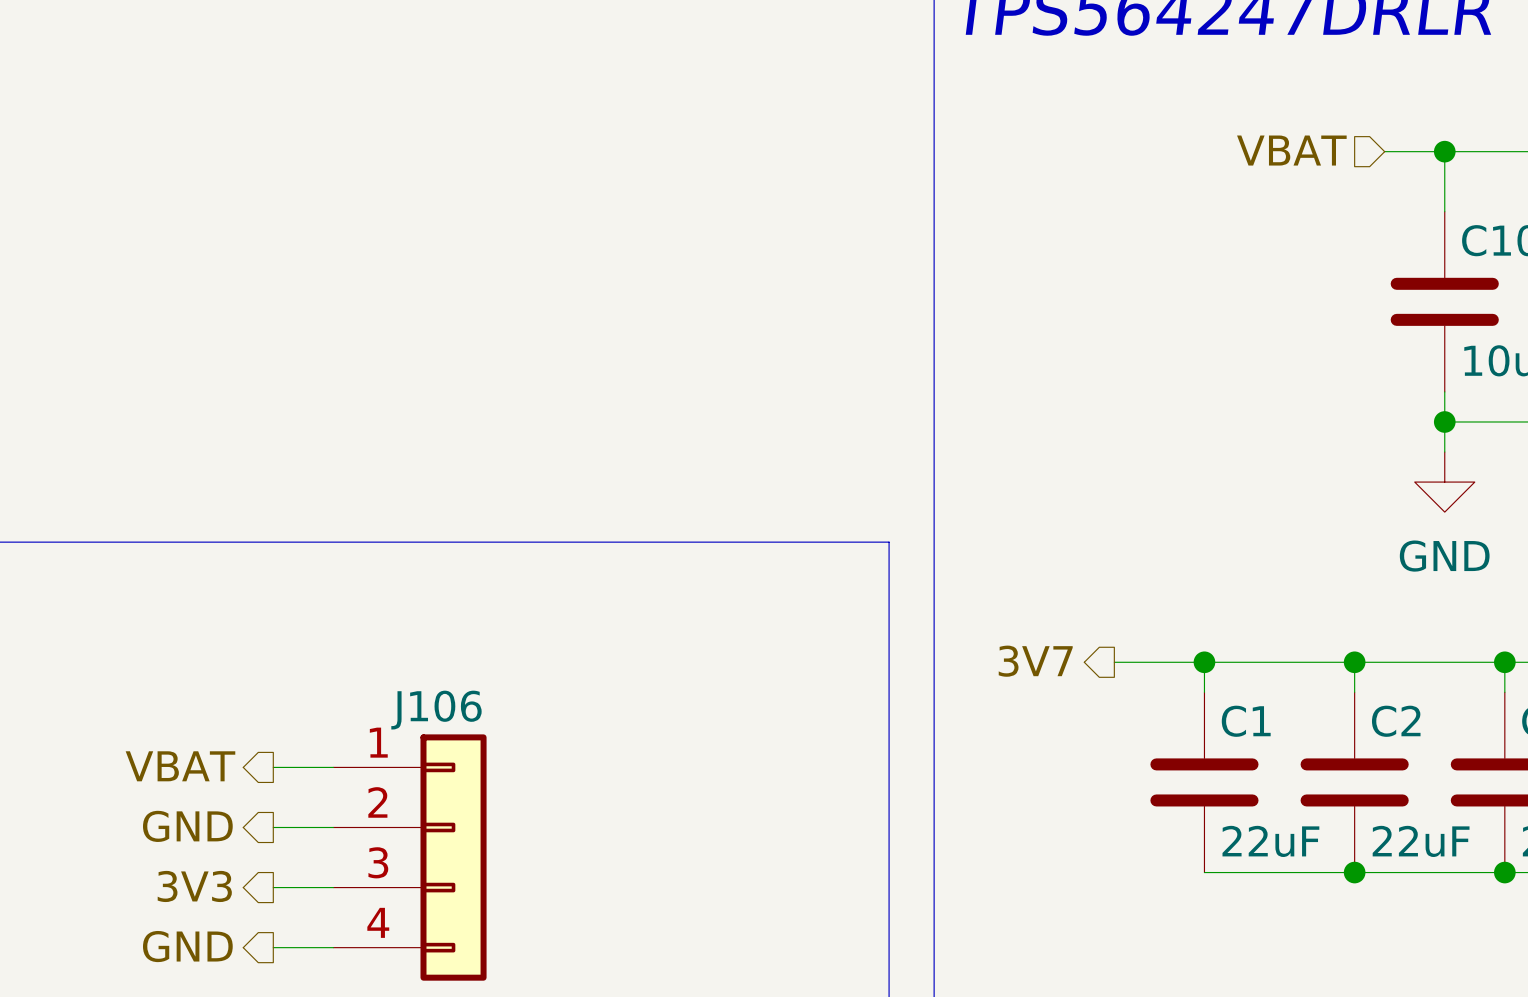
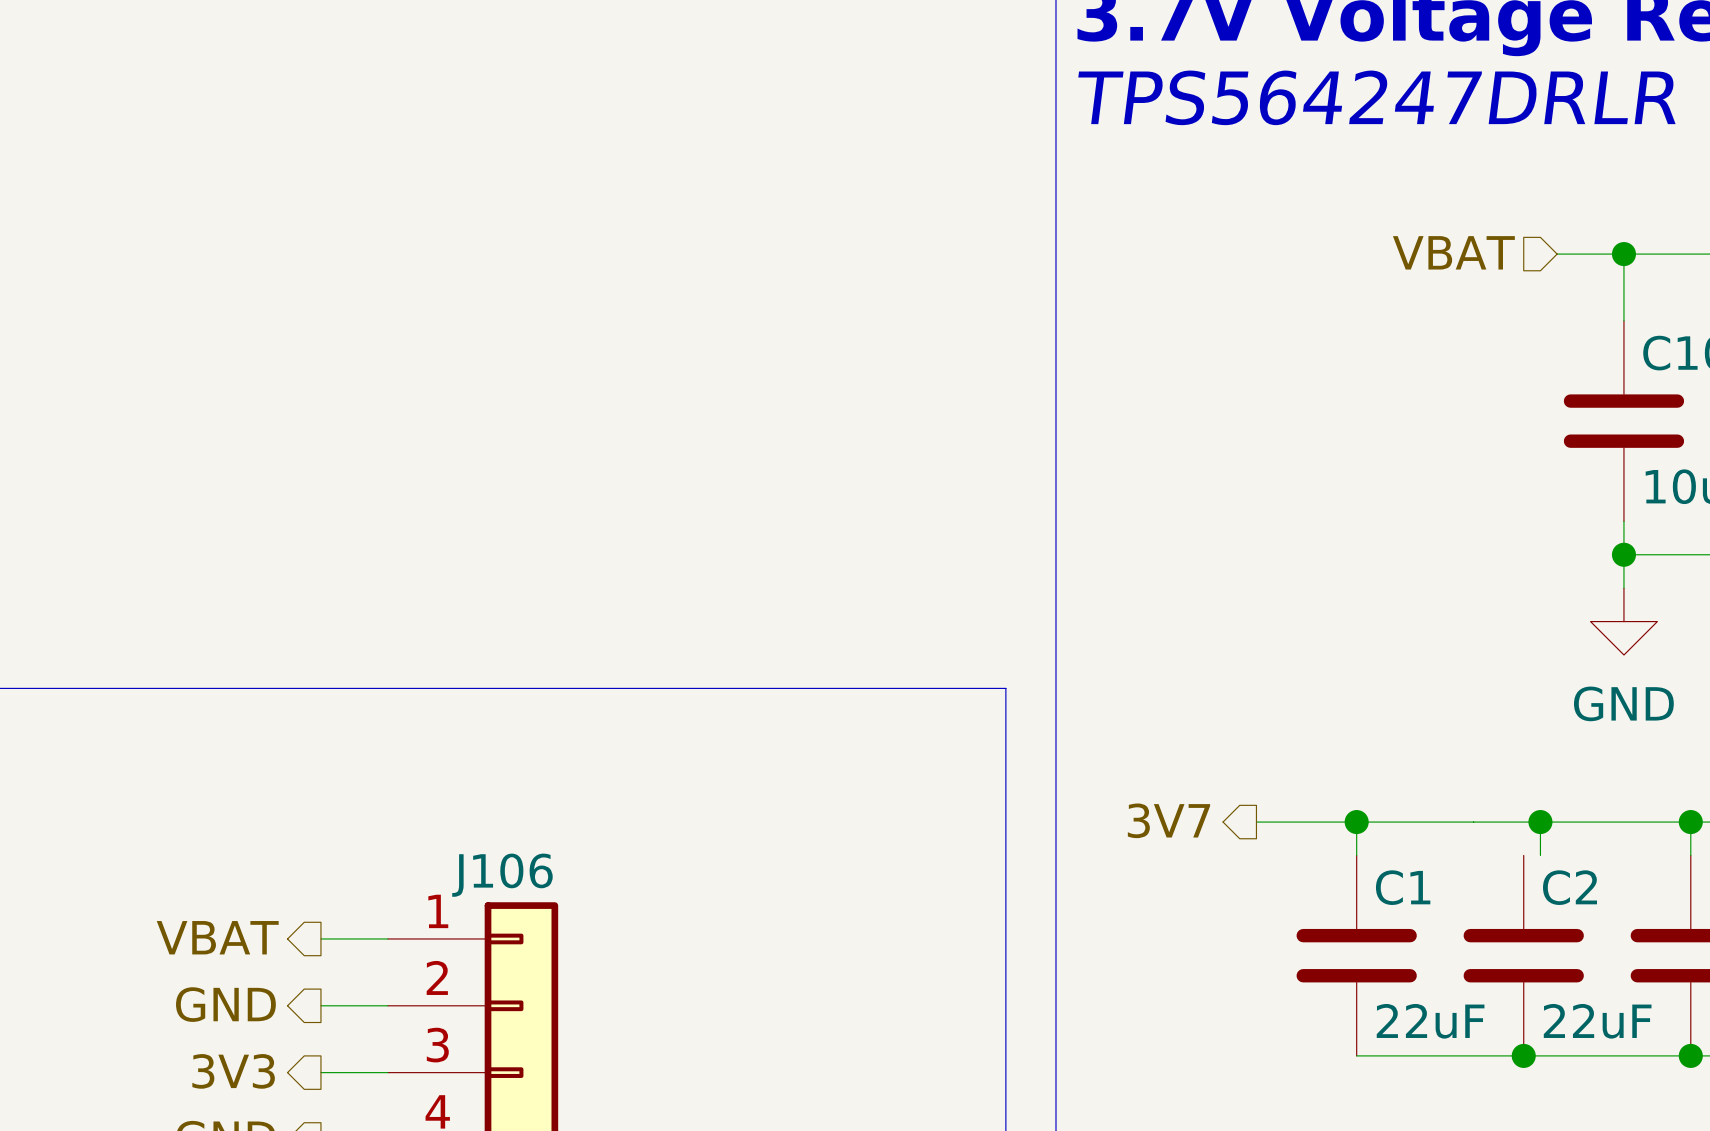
wire: (1354, 662) (1354, 692) -> (1540, 822) (1540, 855)
junction position: (1354, 662) -> (1540, 822)

